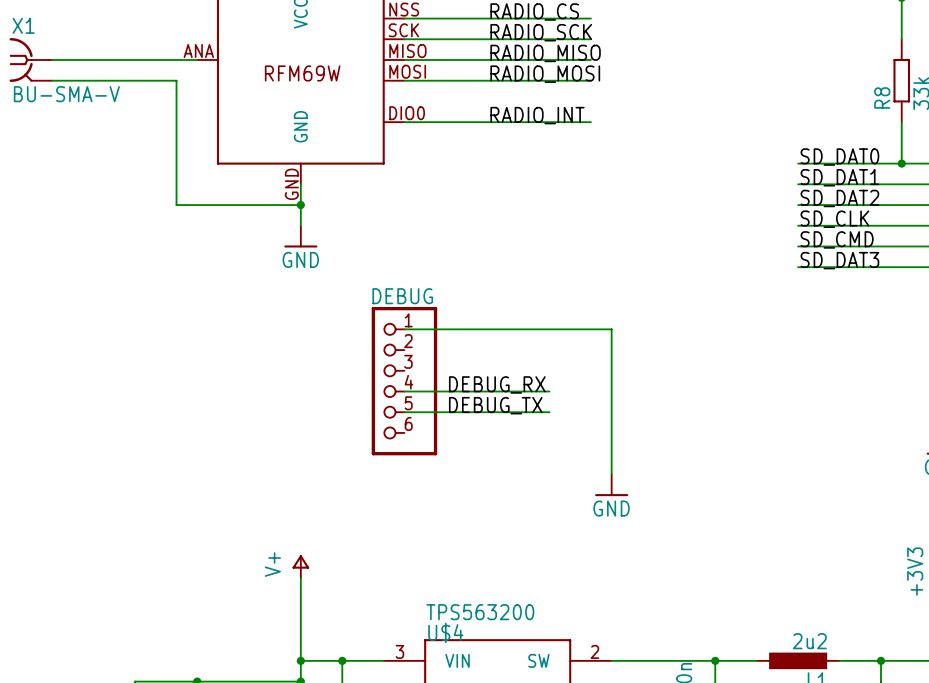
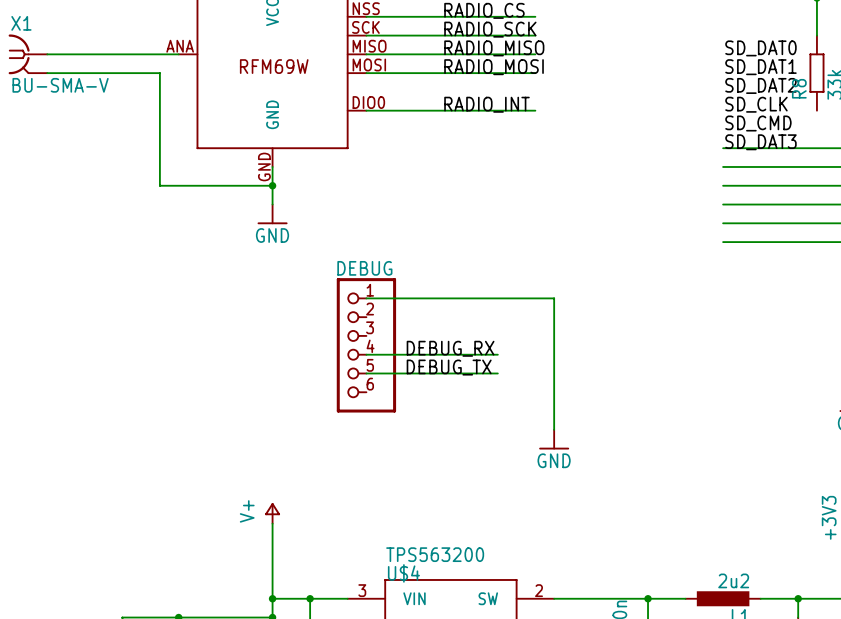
label: none -> SD_DAT0 (760, 48)
wire: (901, 122) (901, 163) -> none
label: SD_DAT0 (839, 157) -> SD_DAT3 (760, 142)
junction: (901, 163) -> none
label position: SD_DAT1 (839, 177) -> SD_DAT1 (760, 67)
label position: SD_DAT2 (839, 198) -> SD_DAT2 (760, 85)
label position: SD_CLK (834, 219) -> SD_CLK (756, 104)
label position: SD_CMD (837, 239) -> SD_CMD (758, 123)
label: SD_DAT3 (839, 260) -> none

